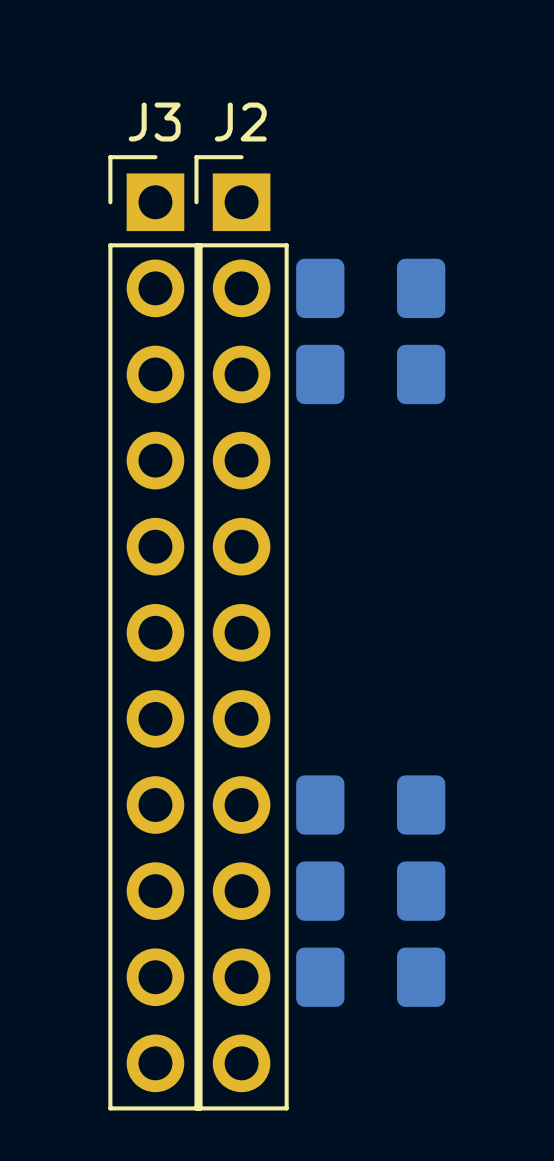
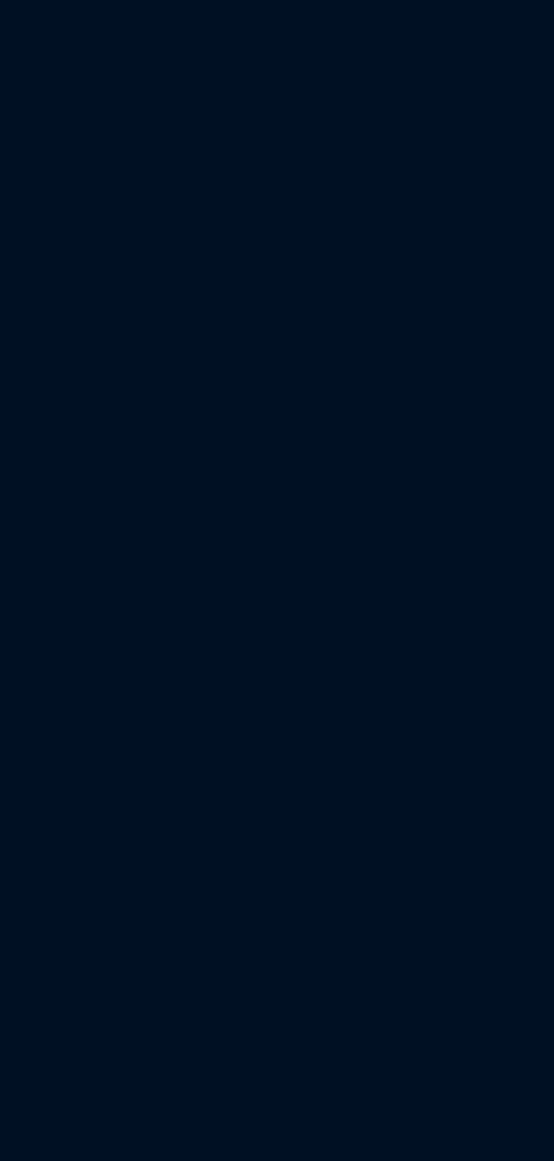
part: (370, 288) -> none
part: (370, 374) -> none
J3: (155, 632) -> none
J2: (241, 632) -> none
part: (370, 805) -> none
part: (370, 891) -> none
part: (370, 977) -> none

